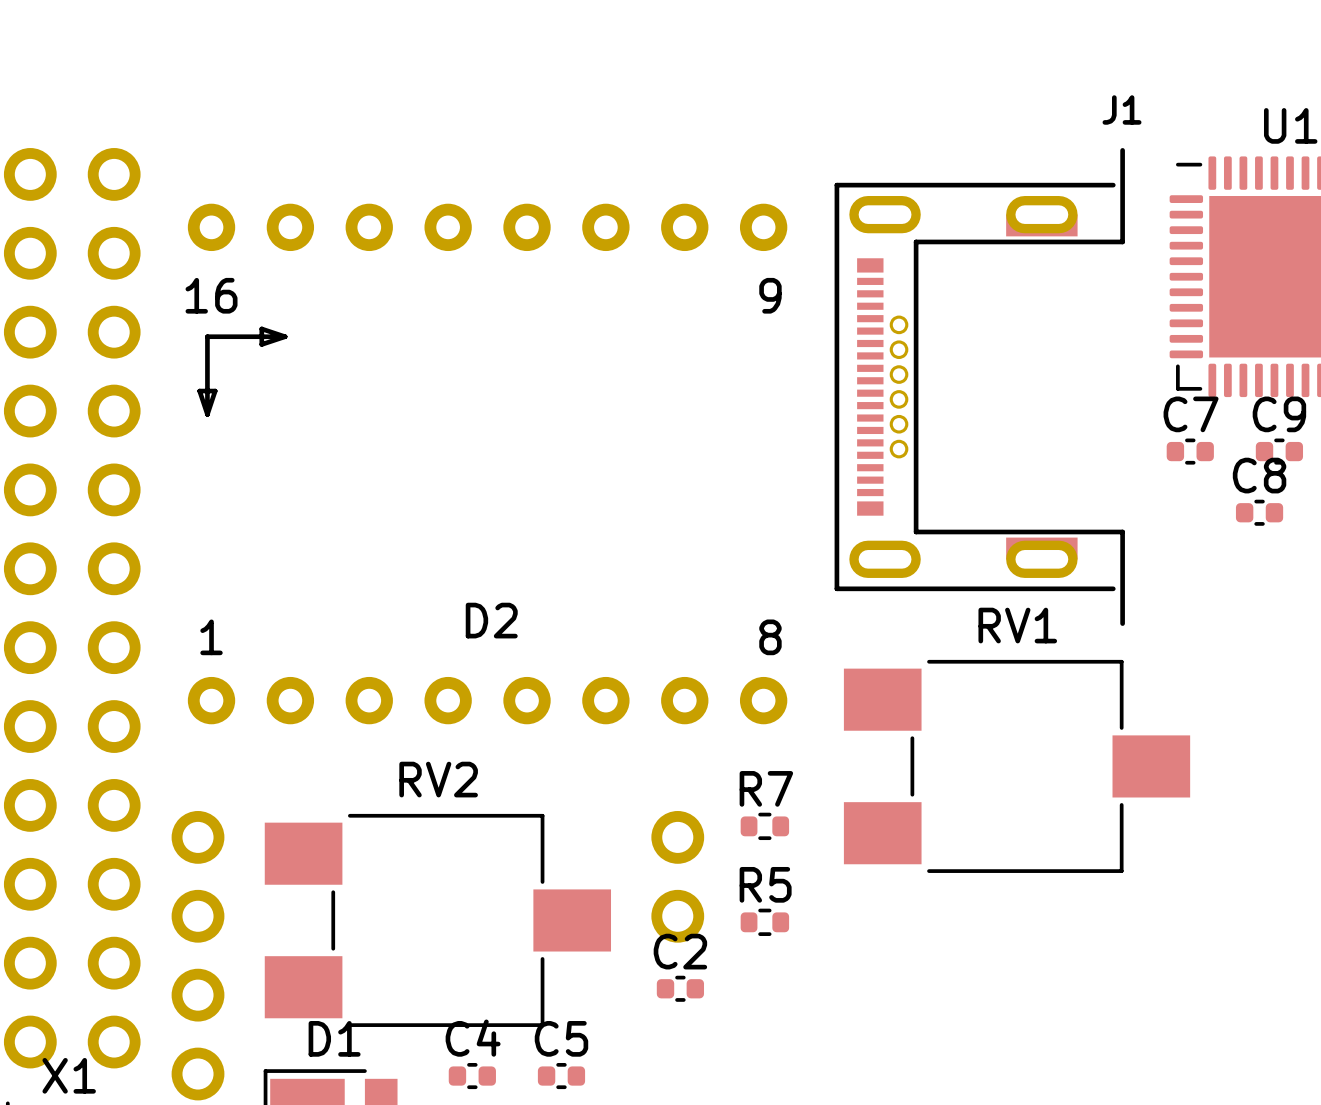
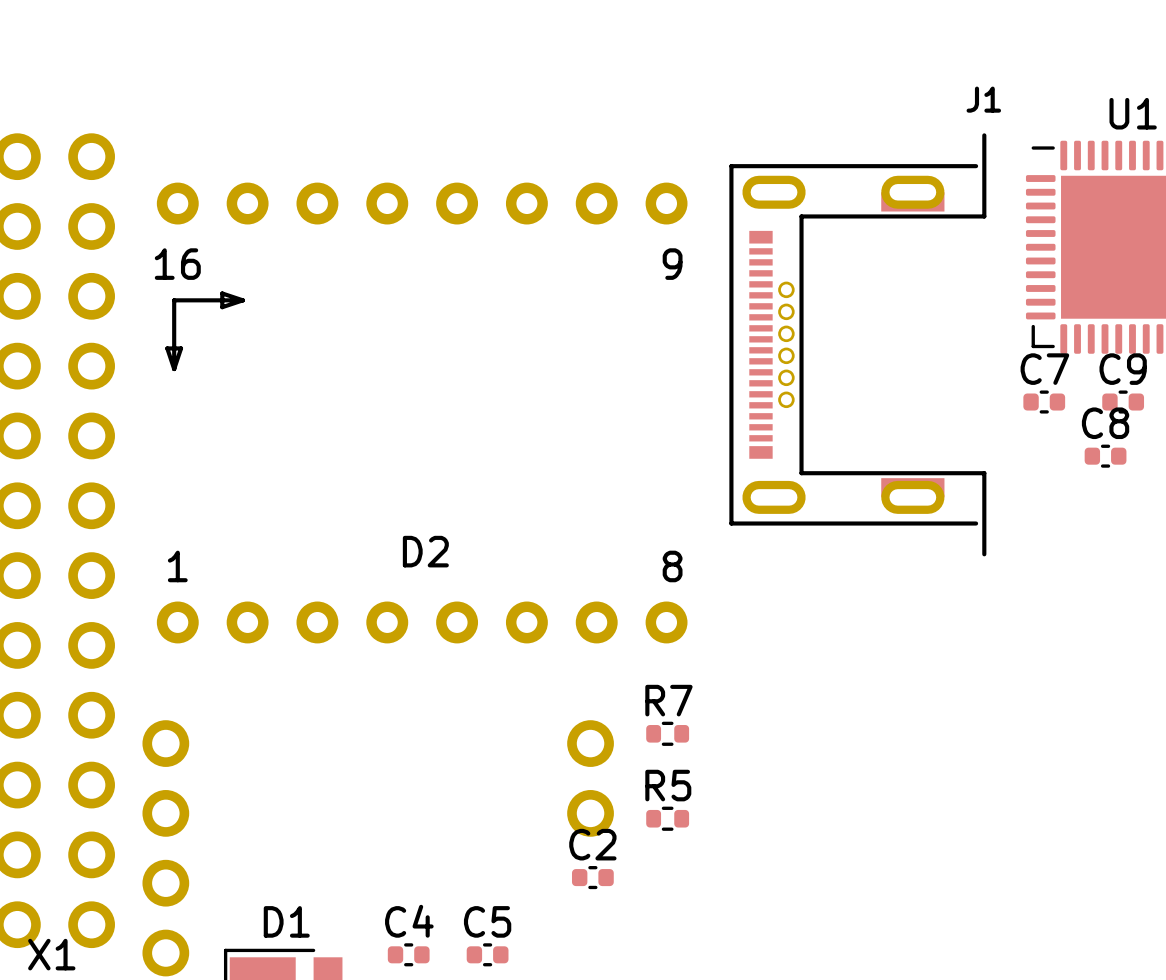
RV1: (1017, 766) -> none
RV2: (437, 920) -> none

